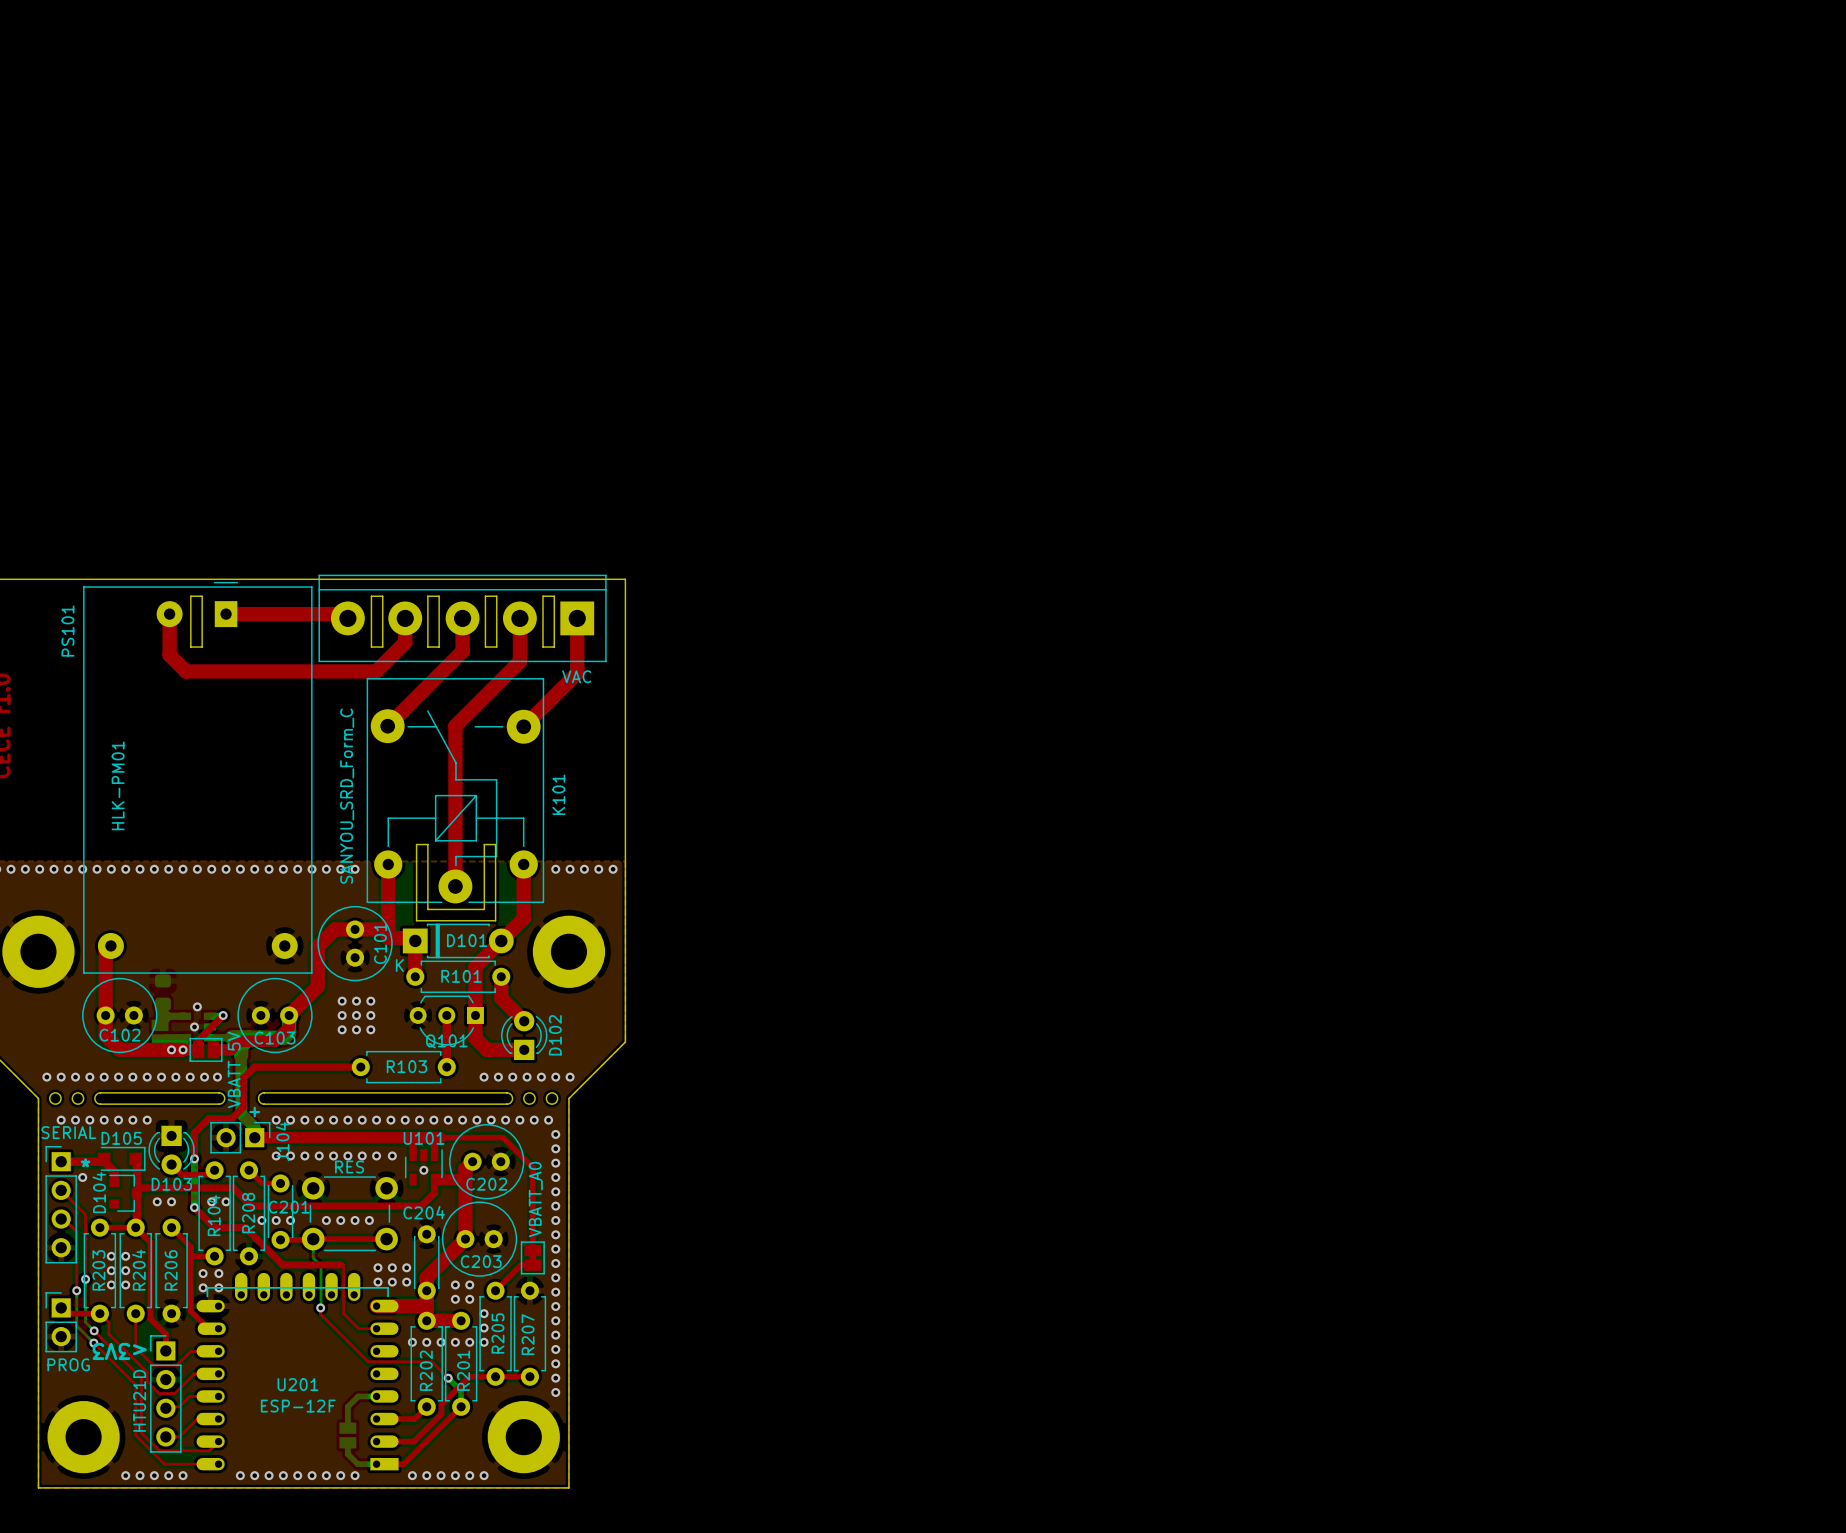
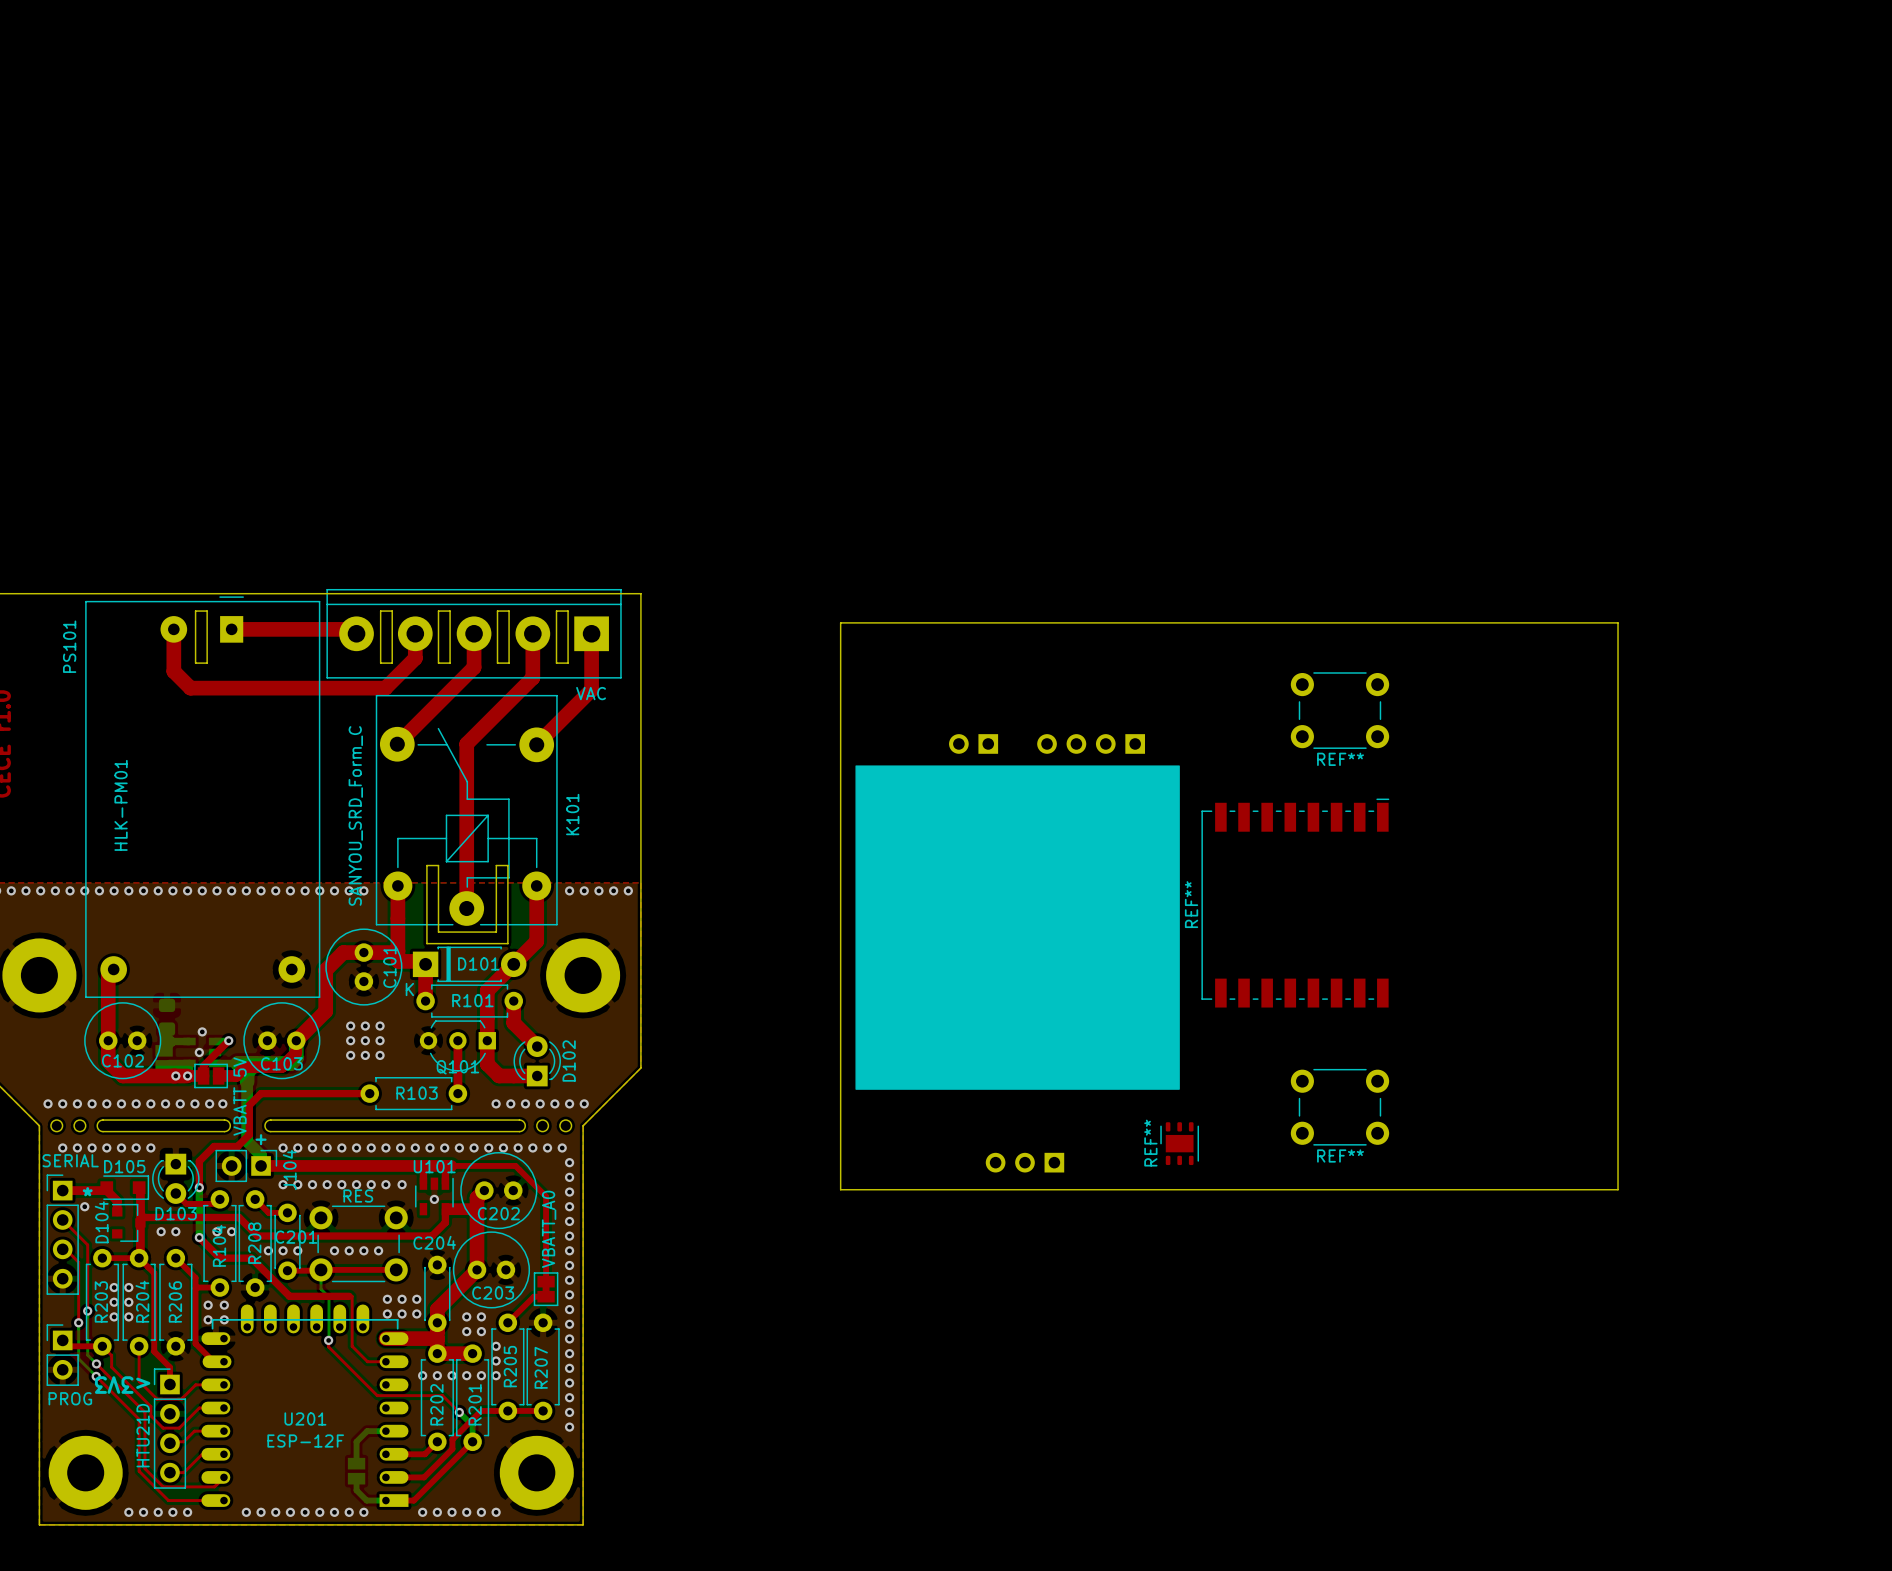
board edge: none -> (840, 622) (840, 1189) (1618, 1189) (1618, 622) (840, 622)
REF**: none -> (1339, 710)
part: none -> (973, 743)
part: none -> (1091, 743)
drawing: none -> [855, 765, 1180, 1090]
REF**: none -> (1295, 903)
REF**: none -> (1339, 1107)
REF**: none -> (1179, 1143)
part: none -> (1024, 1162)

